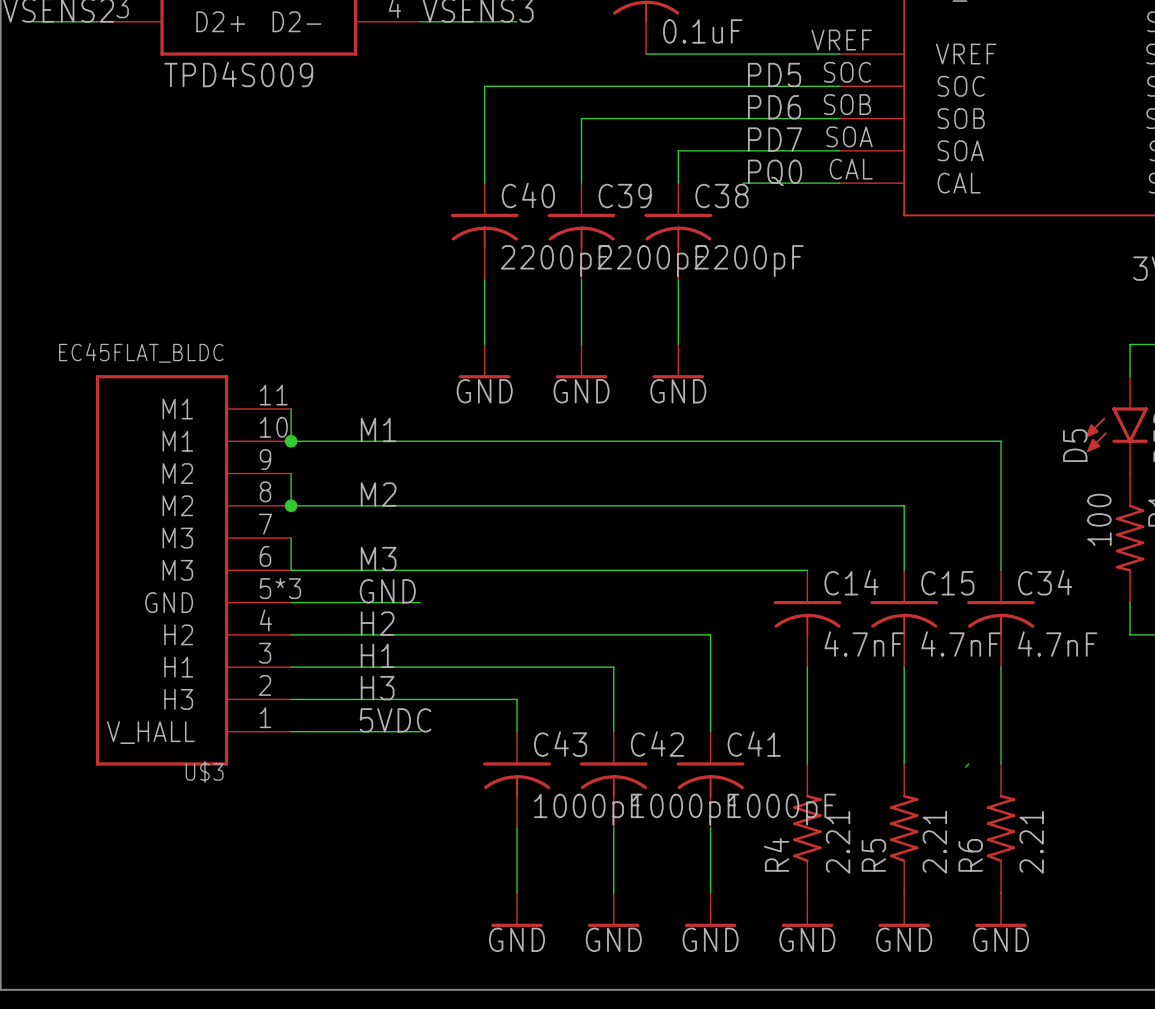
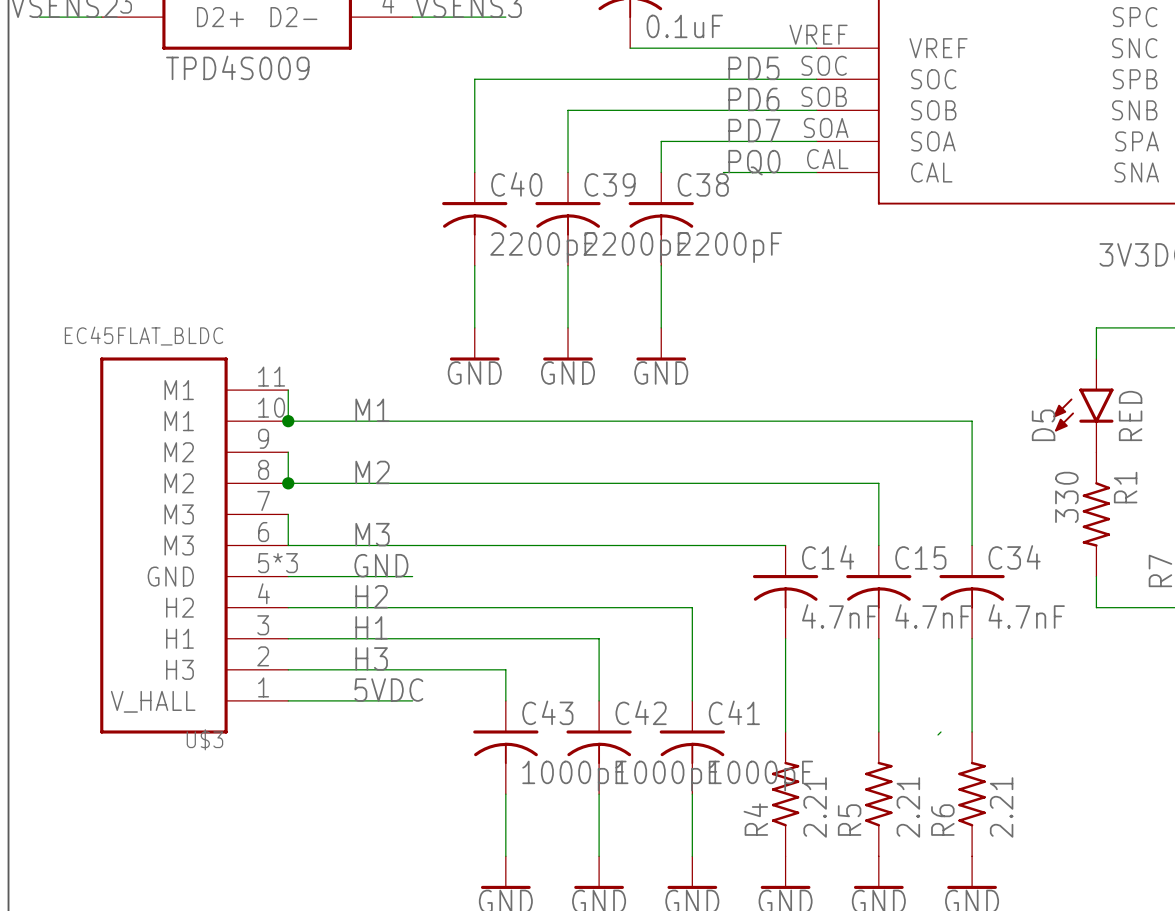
R1 value: 100 (1099, 519) -> 330 (1066, 497)

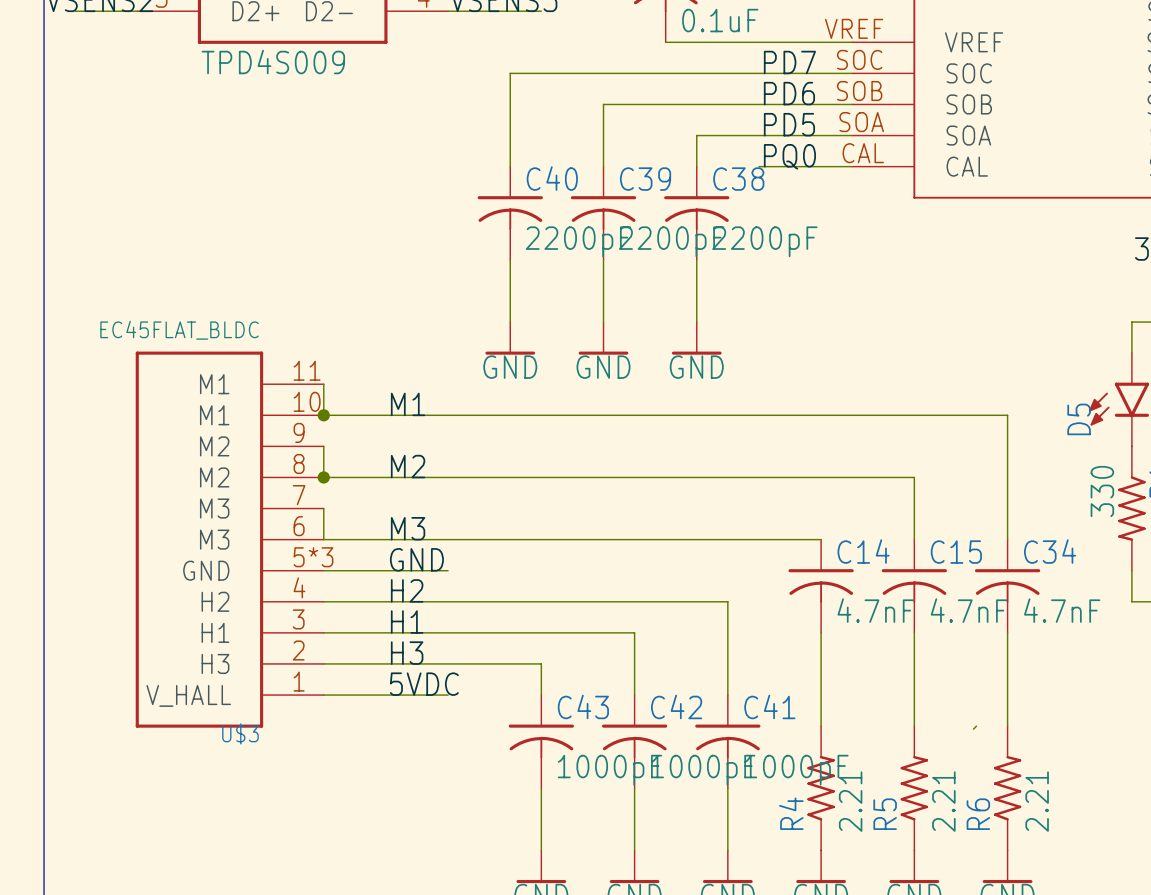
label: PD5 (753, 68) -> PD7 (789, 62)
label: PD7 (754, 130) -> PD5 (789, 124)

